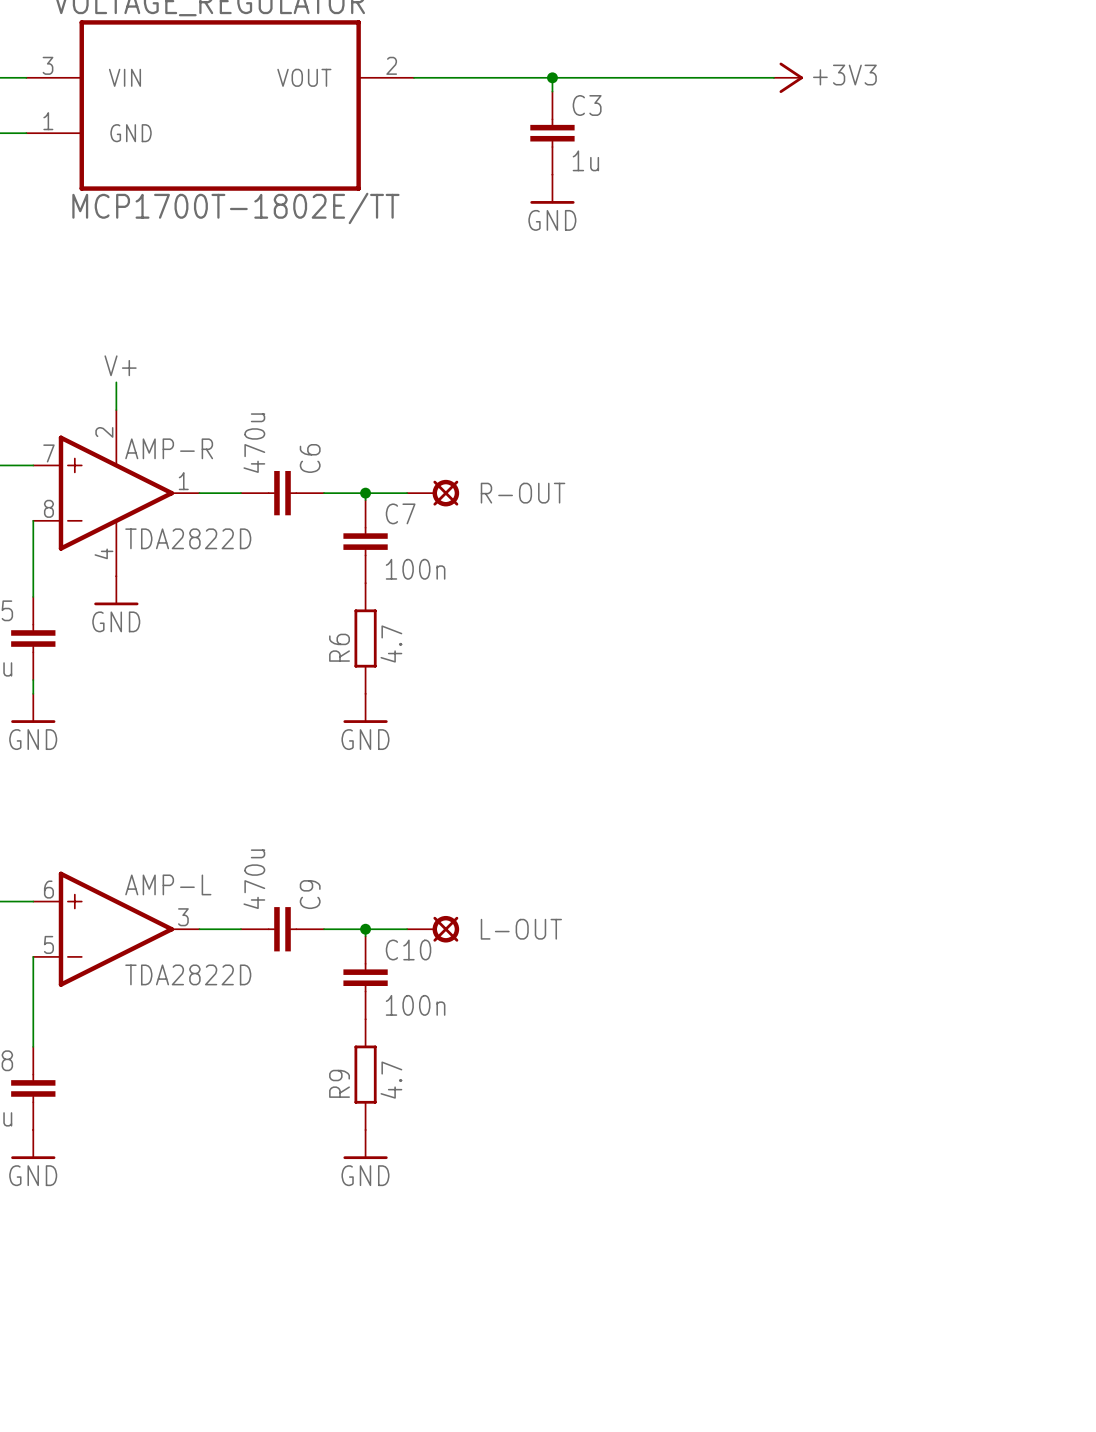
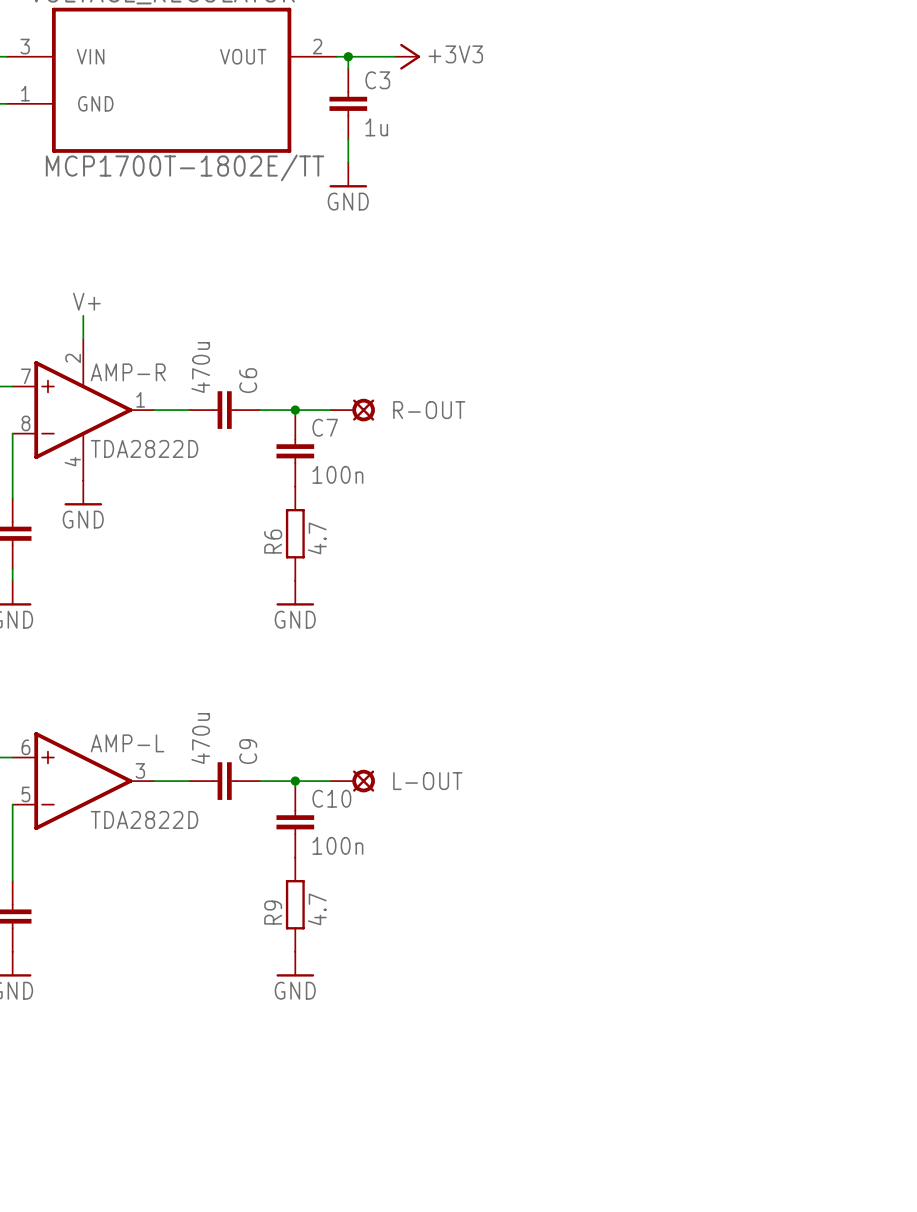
junction: none -> (348, 56)
wire: (483, 77) (773, 77) -> none
power symbol: none -> +3V3 (407, 56)
wire: (552, 77) (552, 91) -> (348, 56) (348, 68)
junction: (552, 77) -> none
power symbol: +3V3 (788, 77) -> none
C3 position: (552, 133) -> (348, 103)
wire: none -> (348, 139) (348, 162)
power symbol position: GND (552, 189) -> GND (348, 175)

